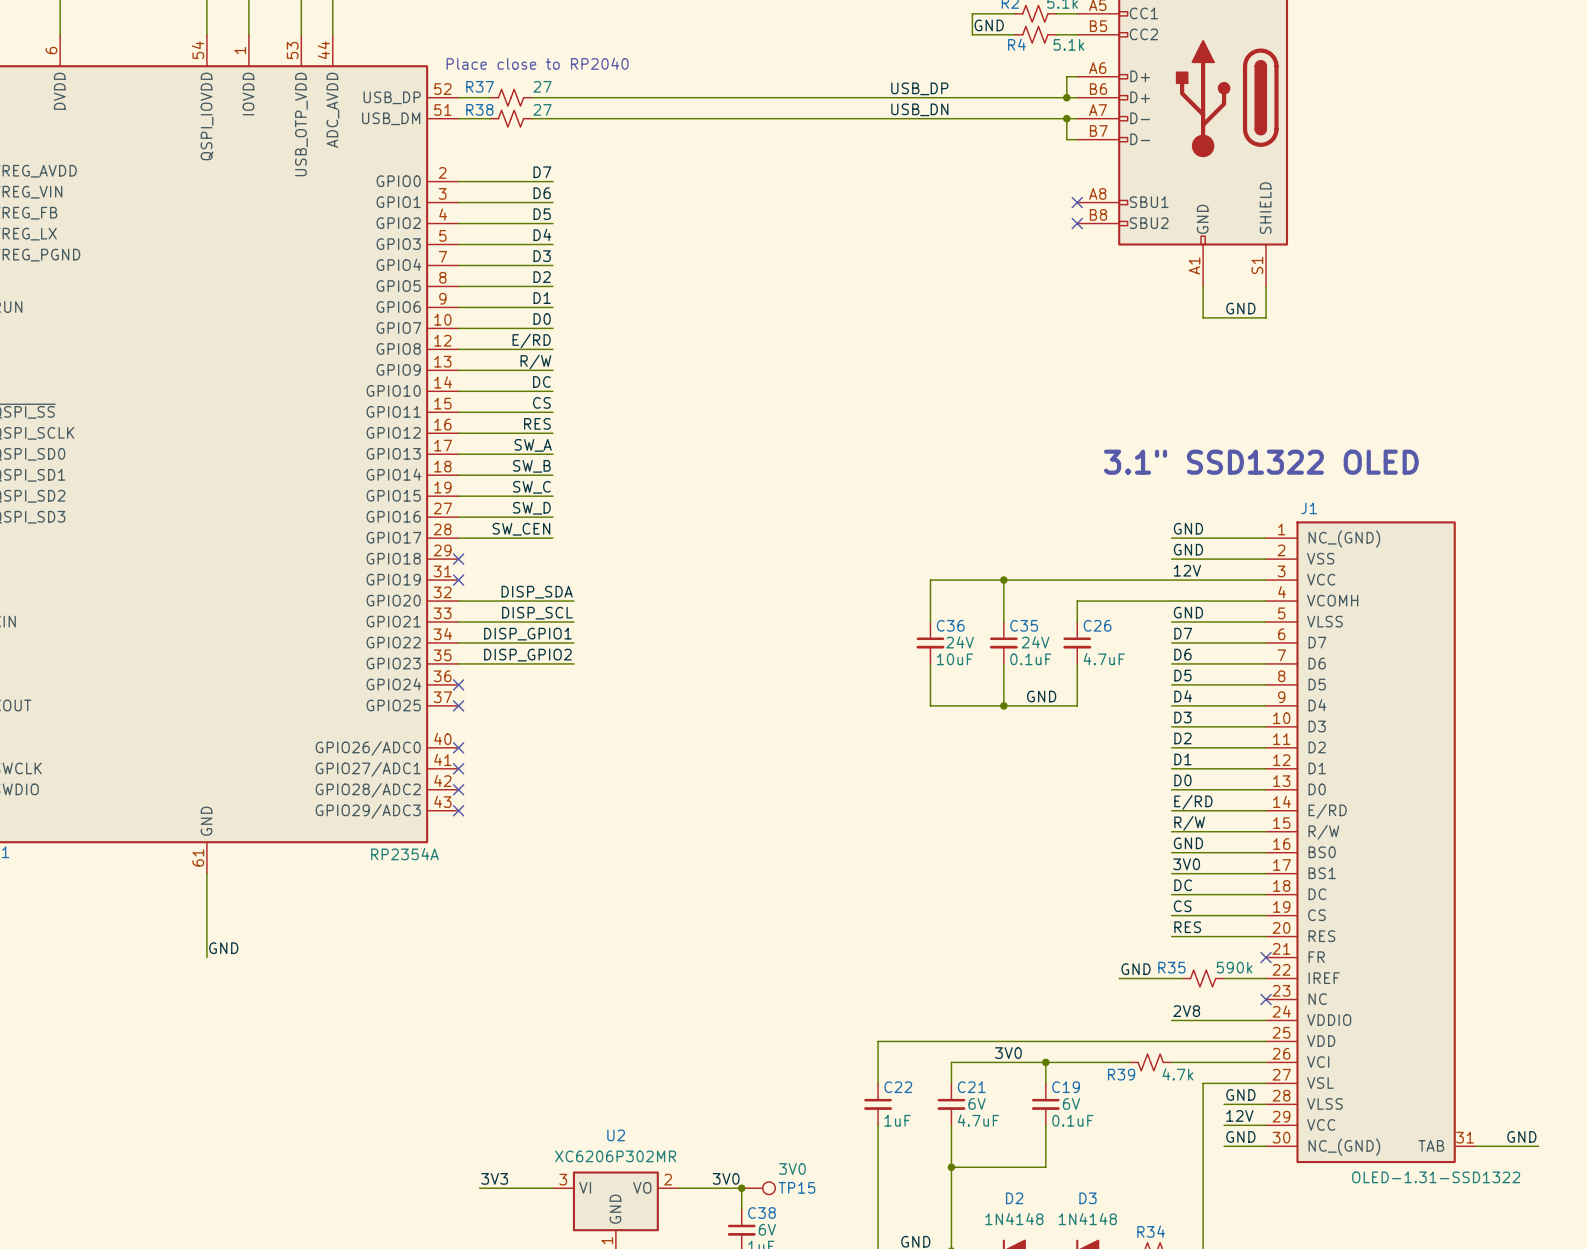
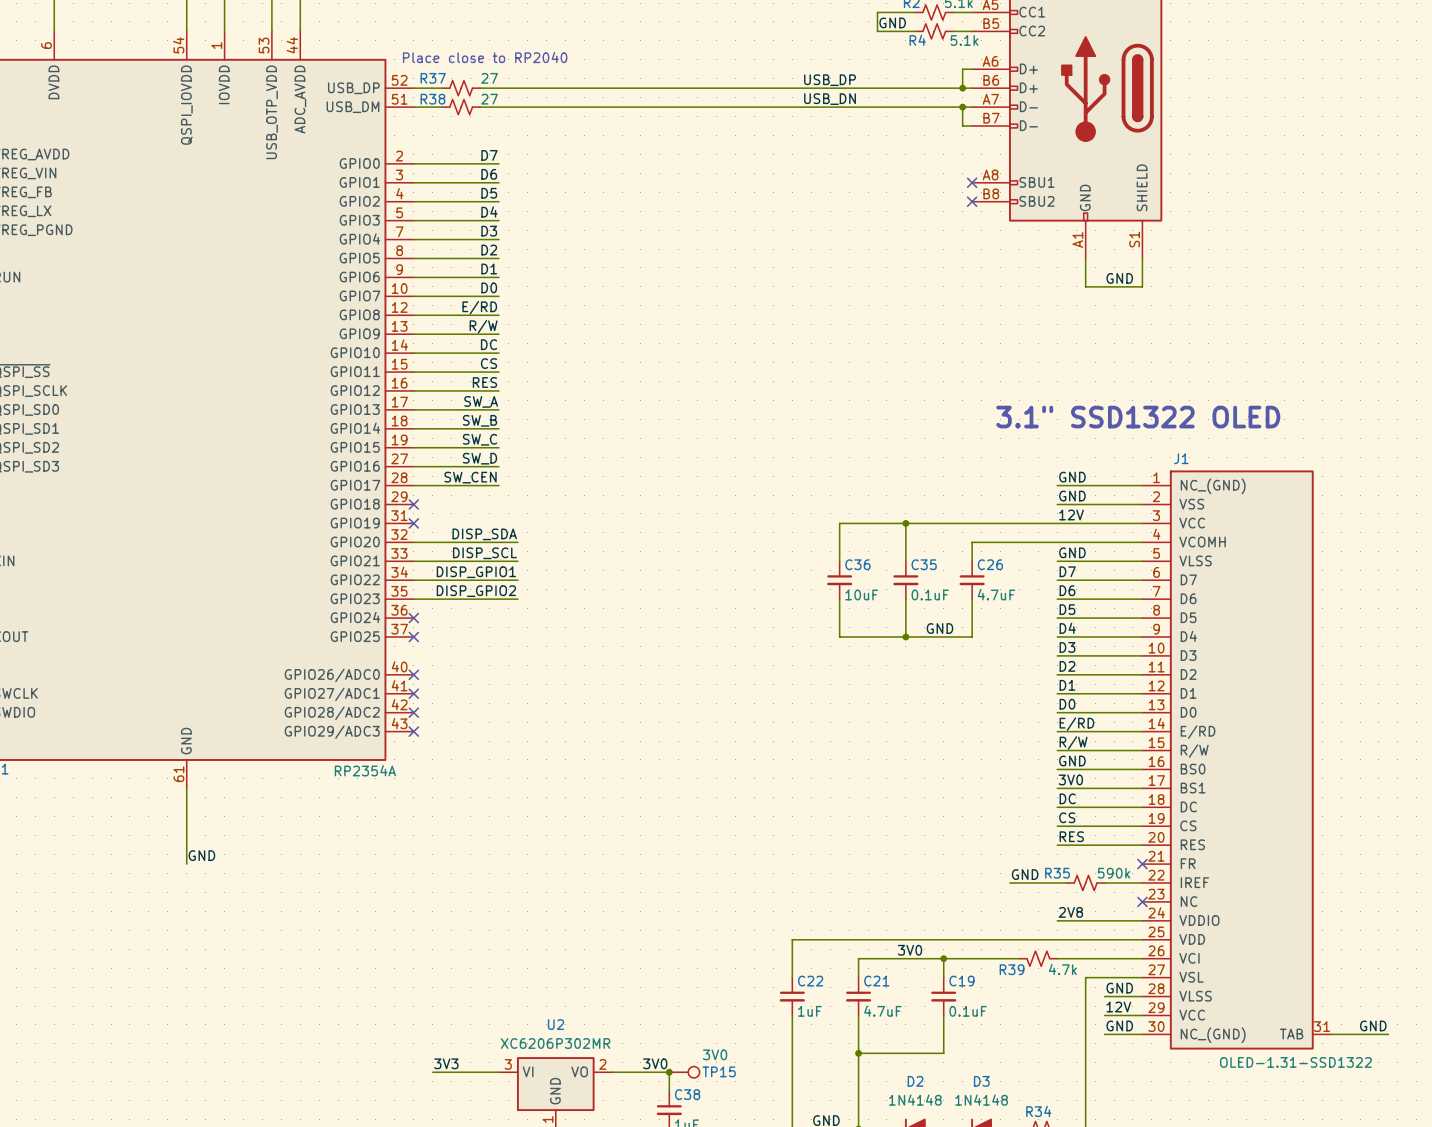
C36 text: 24V (960, 642) -> none
C35 text: 24V (1035, 642) -> none
C21 text: 6V (977, 1103) -> none
C19 text: 6V (1071, 1103) -> none
C38 text: 6V (767, 1229) -> none

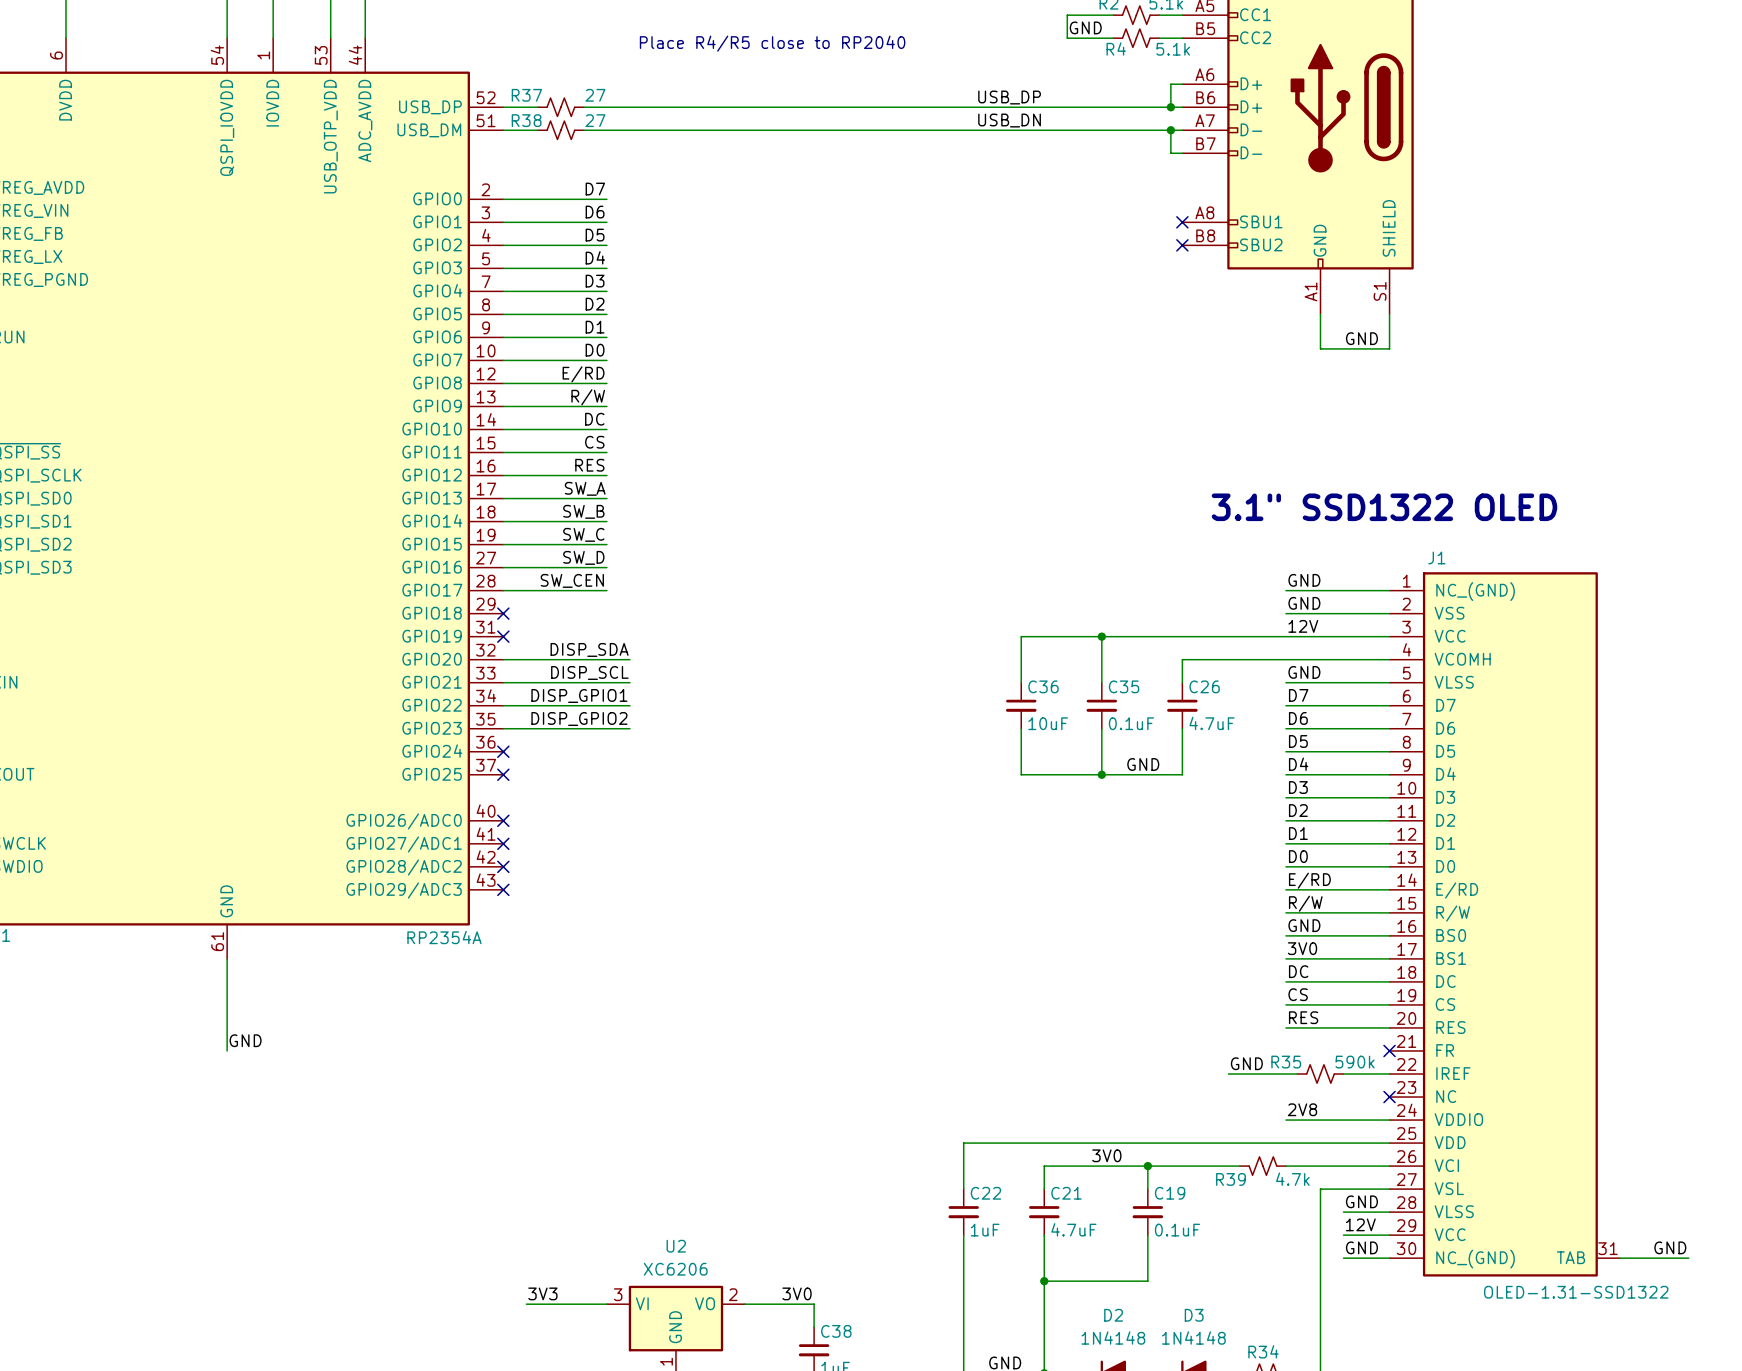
text: none -> Place R4/R5 close to RP2040 (772, 43)
text: Place close to RP2040 (485, 57) -> none
U2 value: XC6206P302MR (555, 1043) -> XC6206 (675, 1269)
junction: (669, 1072) -> none
TP15: 3V0 (684, 1072) -> none

